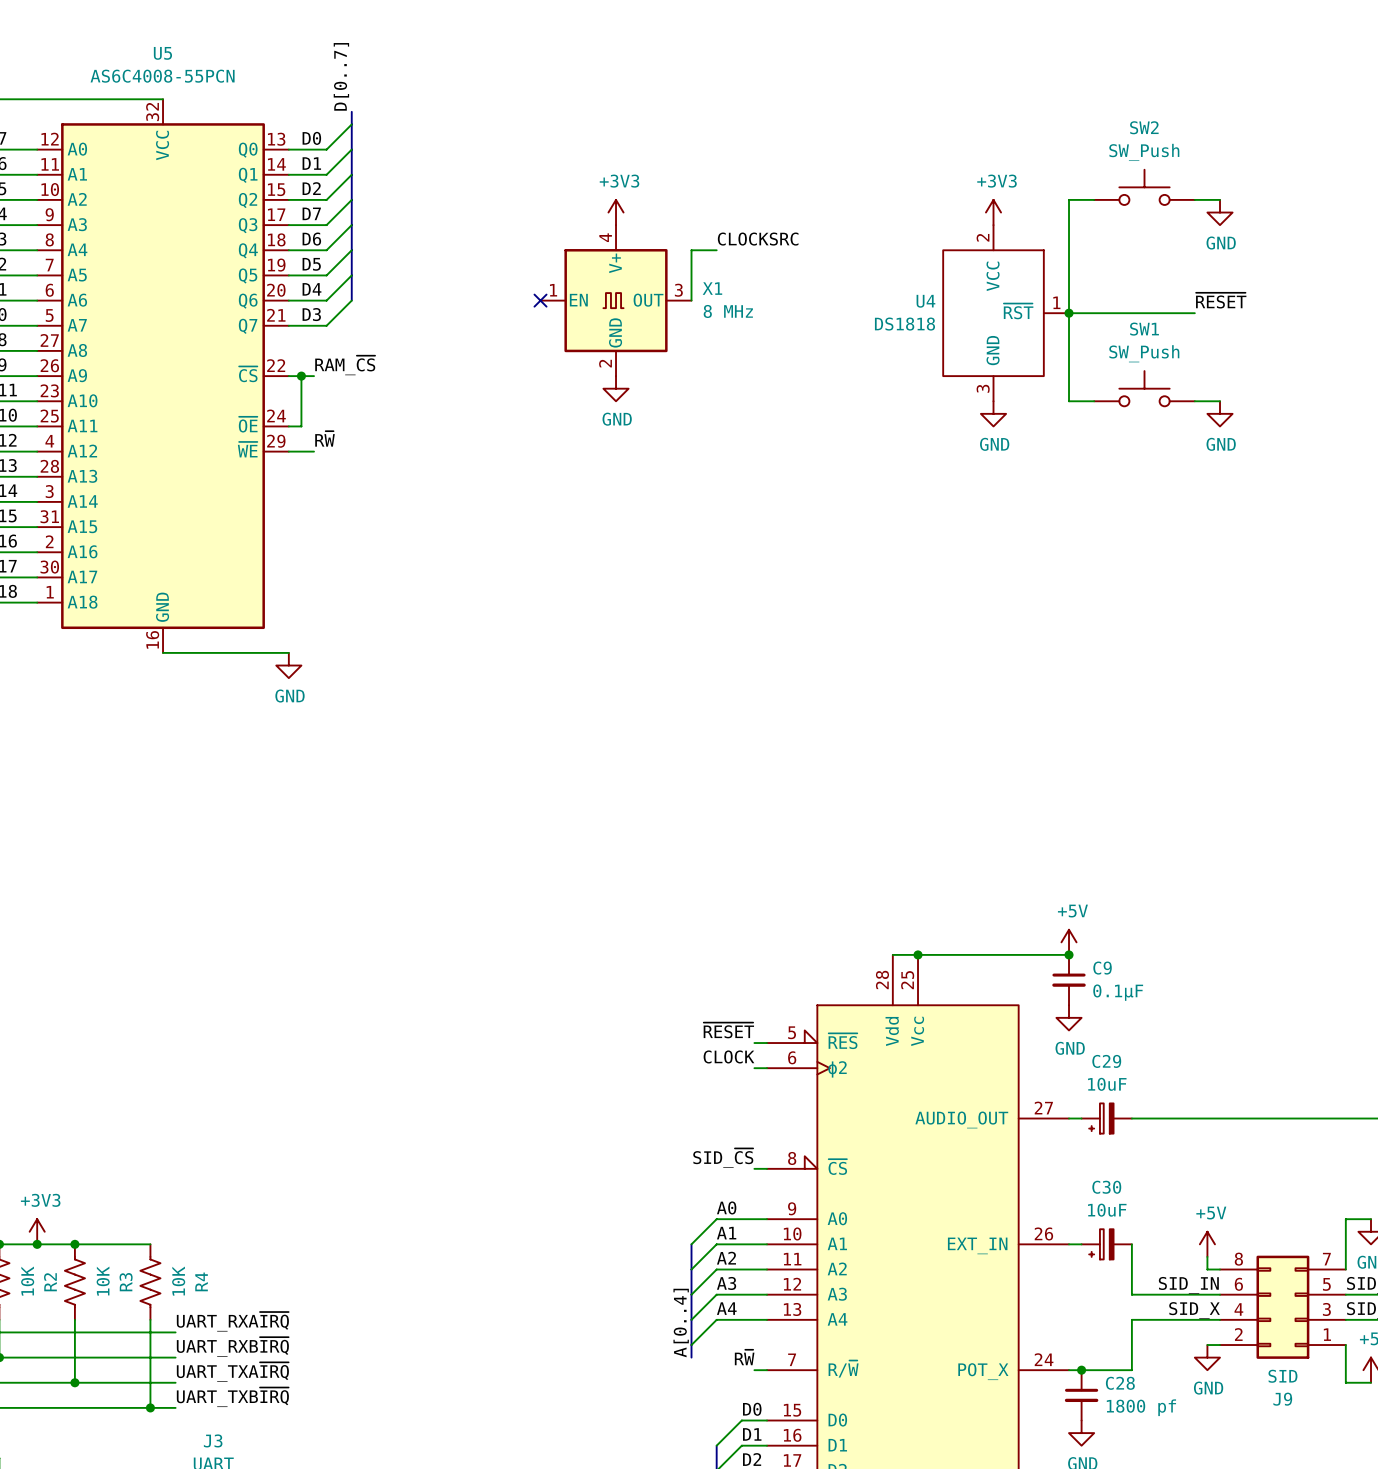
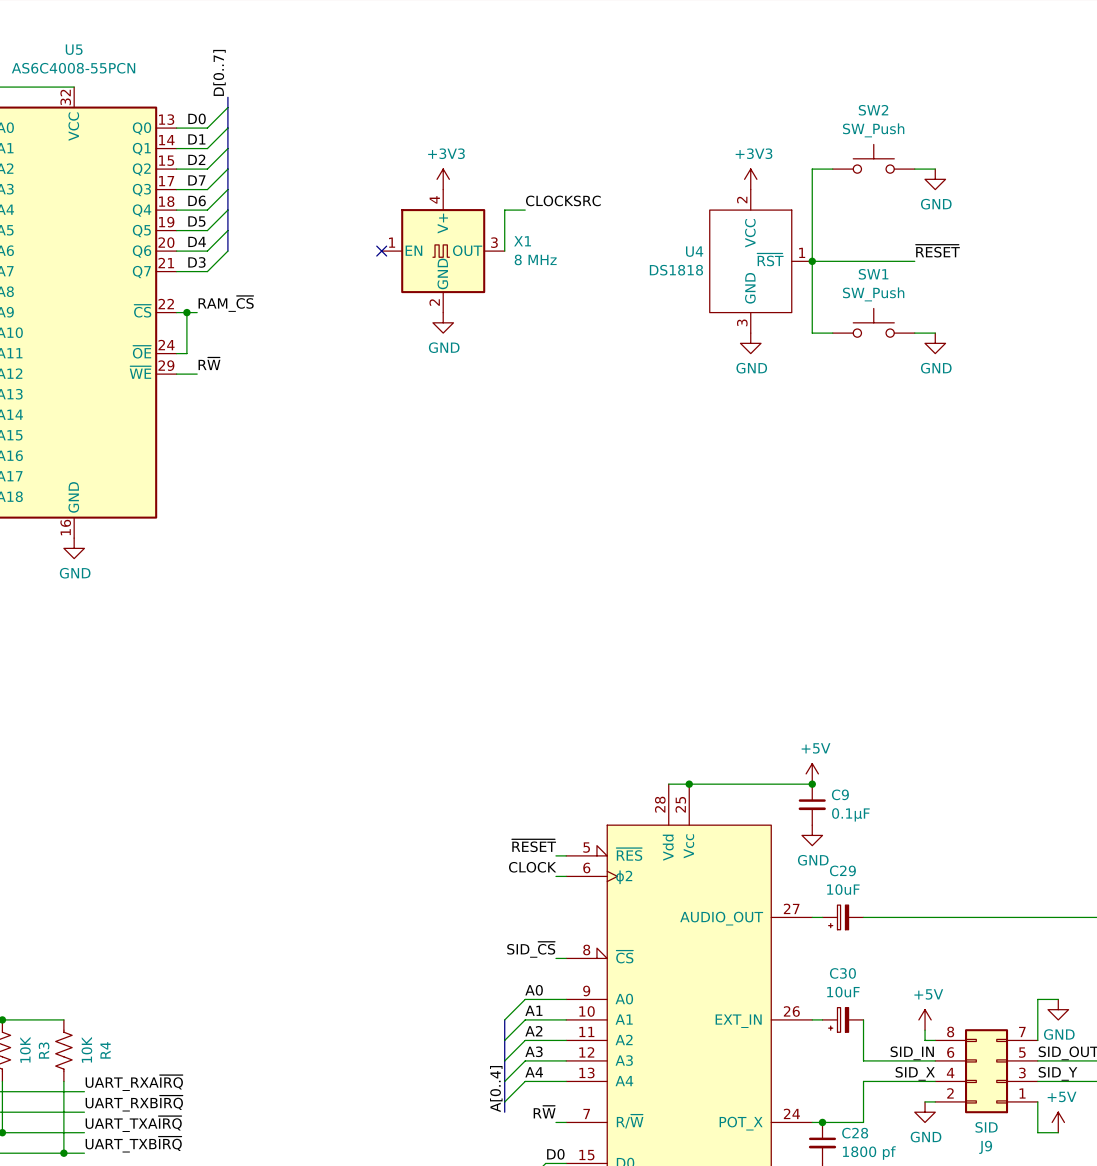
wire: (163, 652) (288, 652) -> none
power symbol position: GND (288, 665) -> GND (74, 548)

